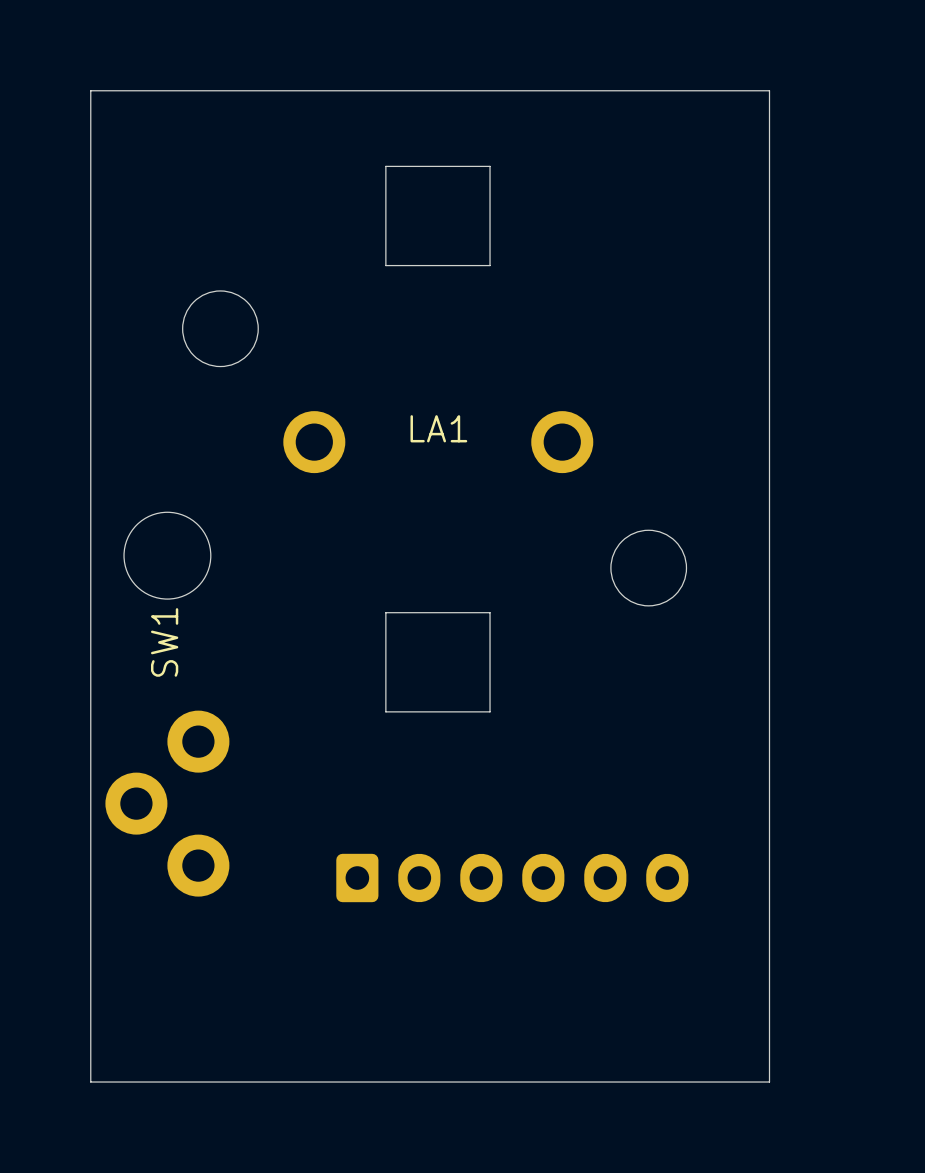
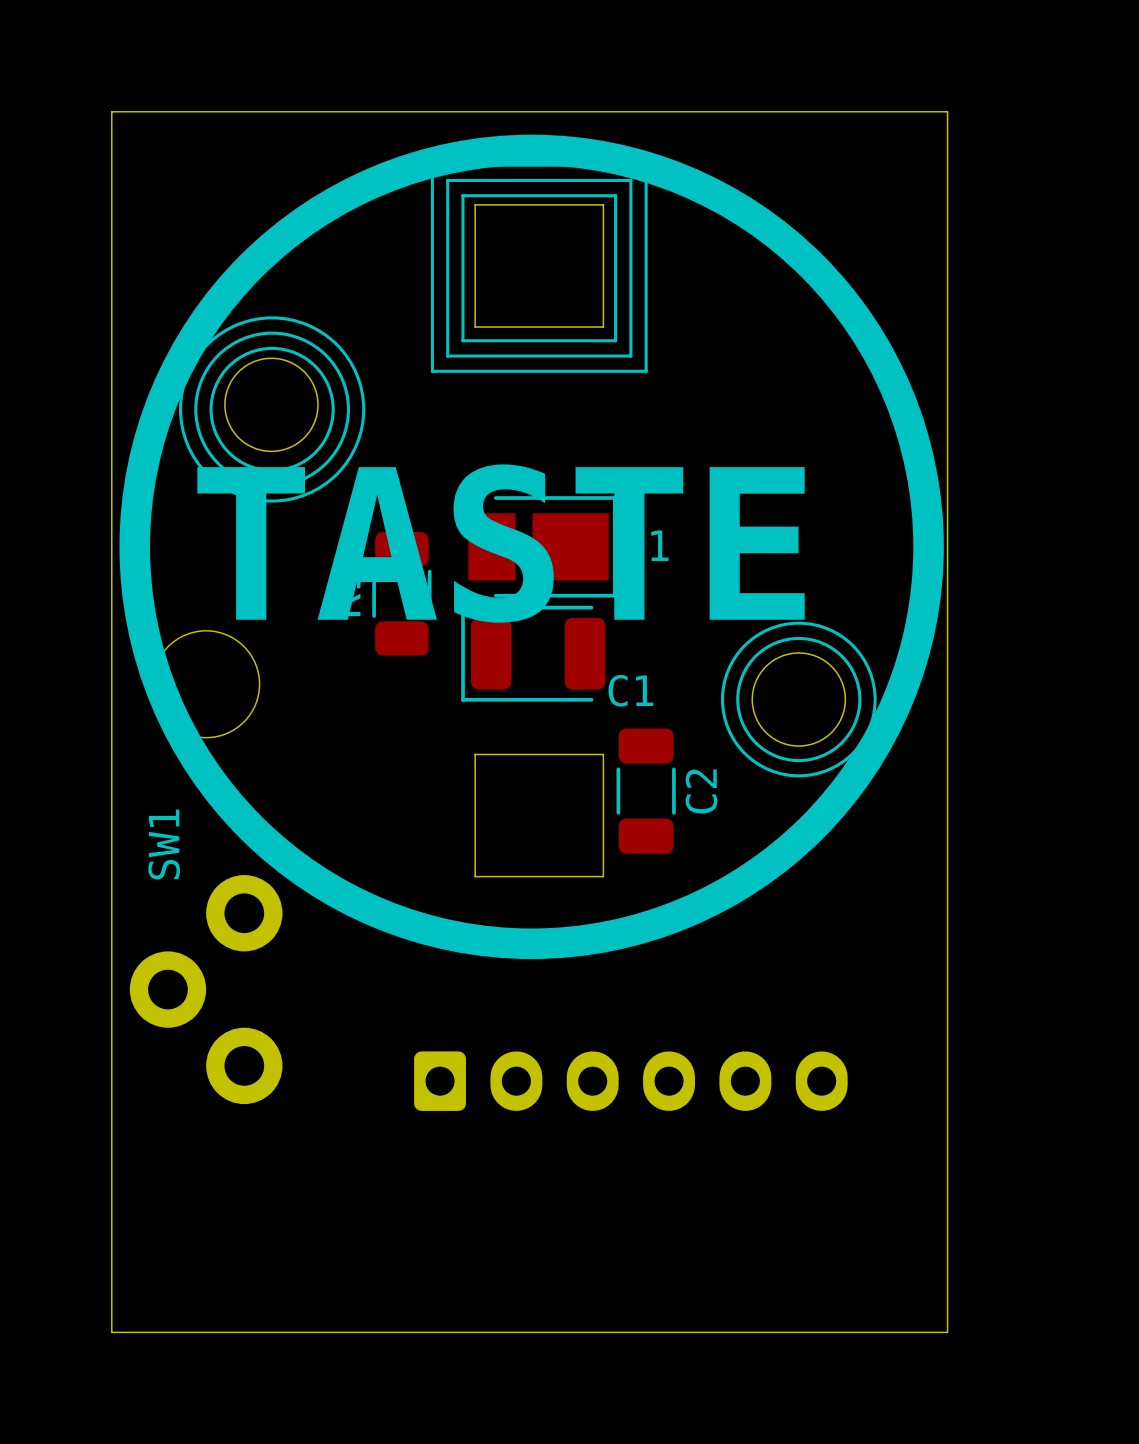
drawing: none -> [119, 134, 944, 960]
line: none -> (432, 165) (646, 165) (646, 371) (432, 371) (432, 165)
line: none -> (447, 180) (630, 180) (630, 356) (447, 356) (447, 180)
line: none -> (462, 195) (615, 195) (615, 340) (462, 340) (462, 195)
text: none -> TASTE (501, 543)
LA1: (438, 442) -> none
part: none -> (542, 546)
part: none -> (401, 593)
C1: none -> (533, 653)
SW1 name position: SW1 (164, 642) -> SW1 (164, 844)
C2: none -> (646, 791)

